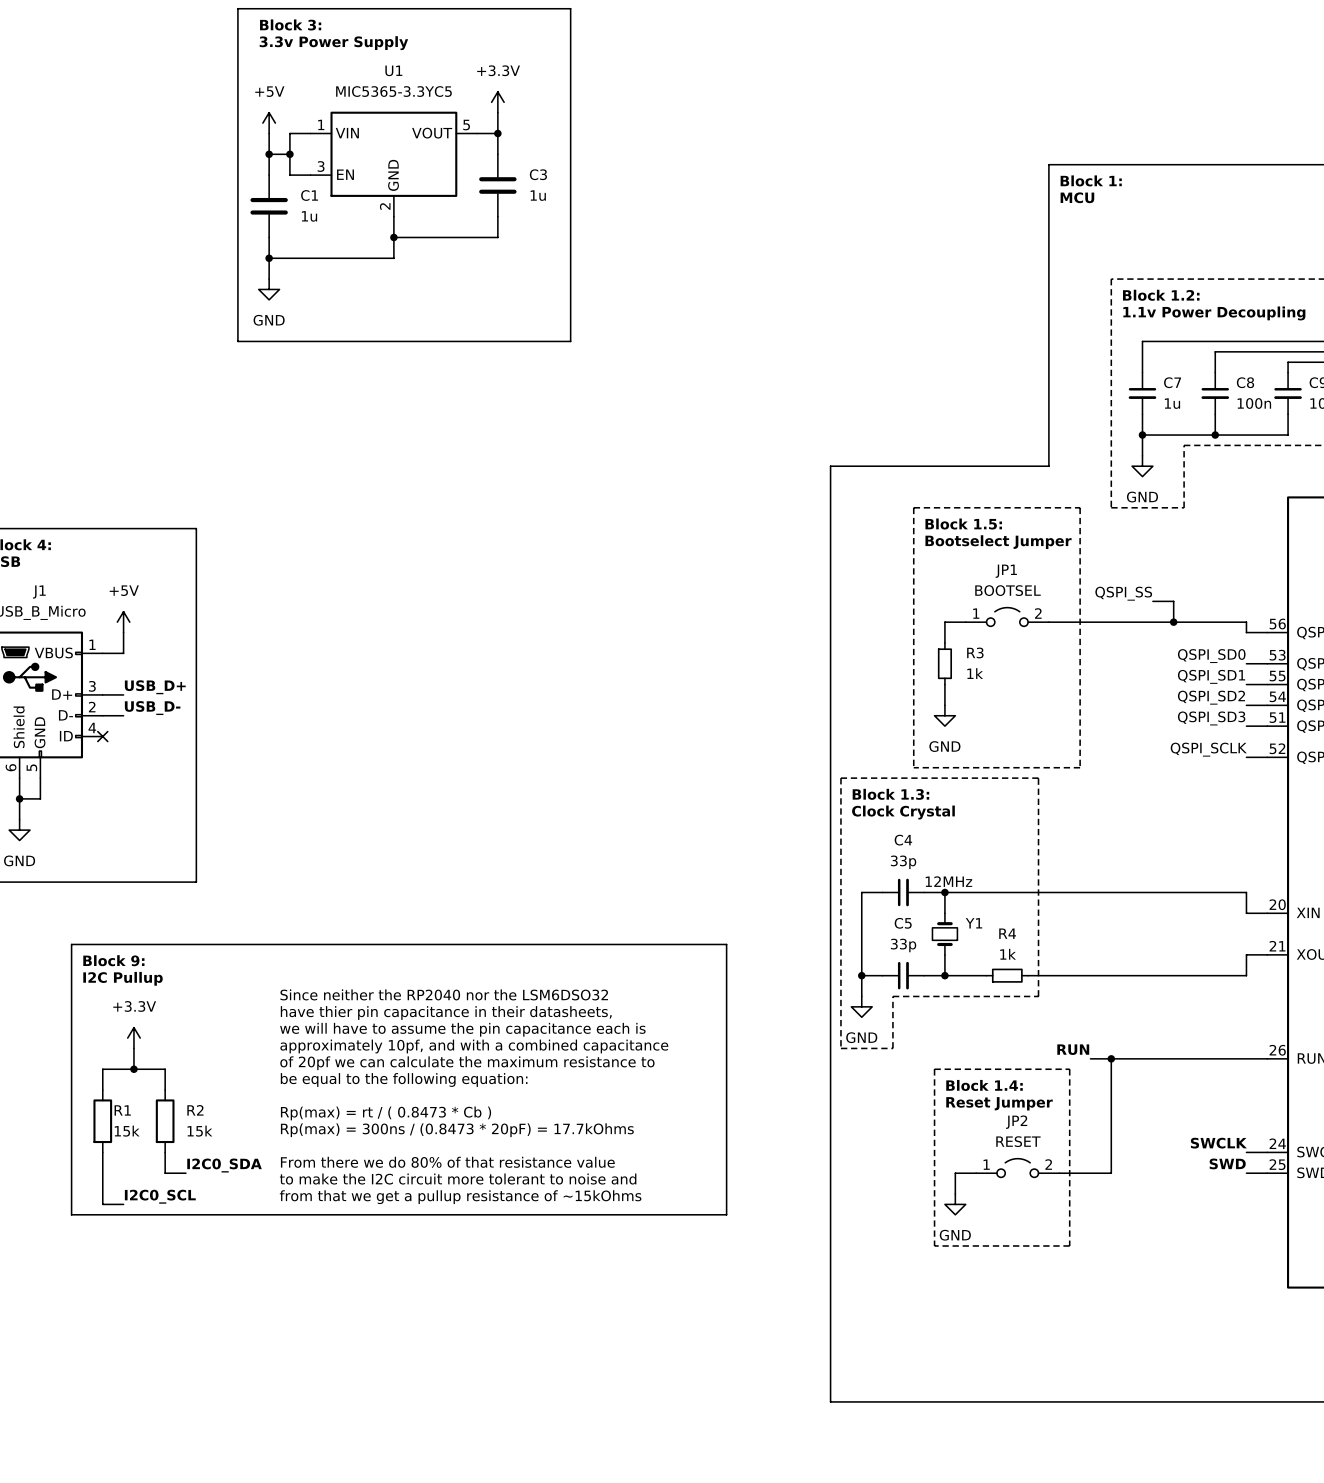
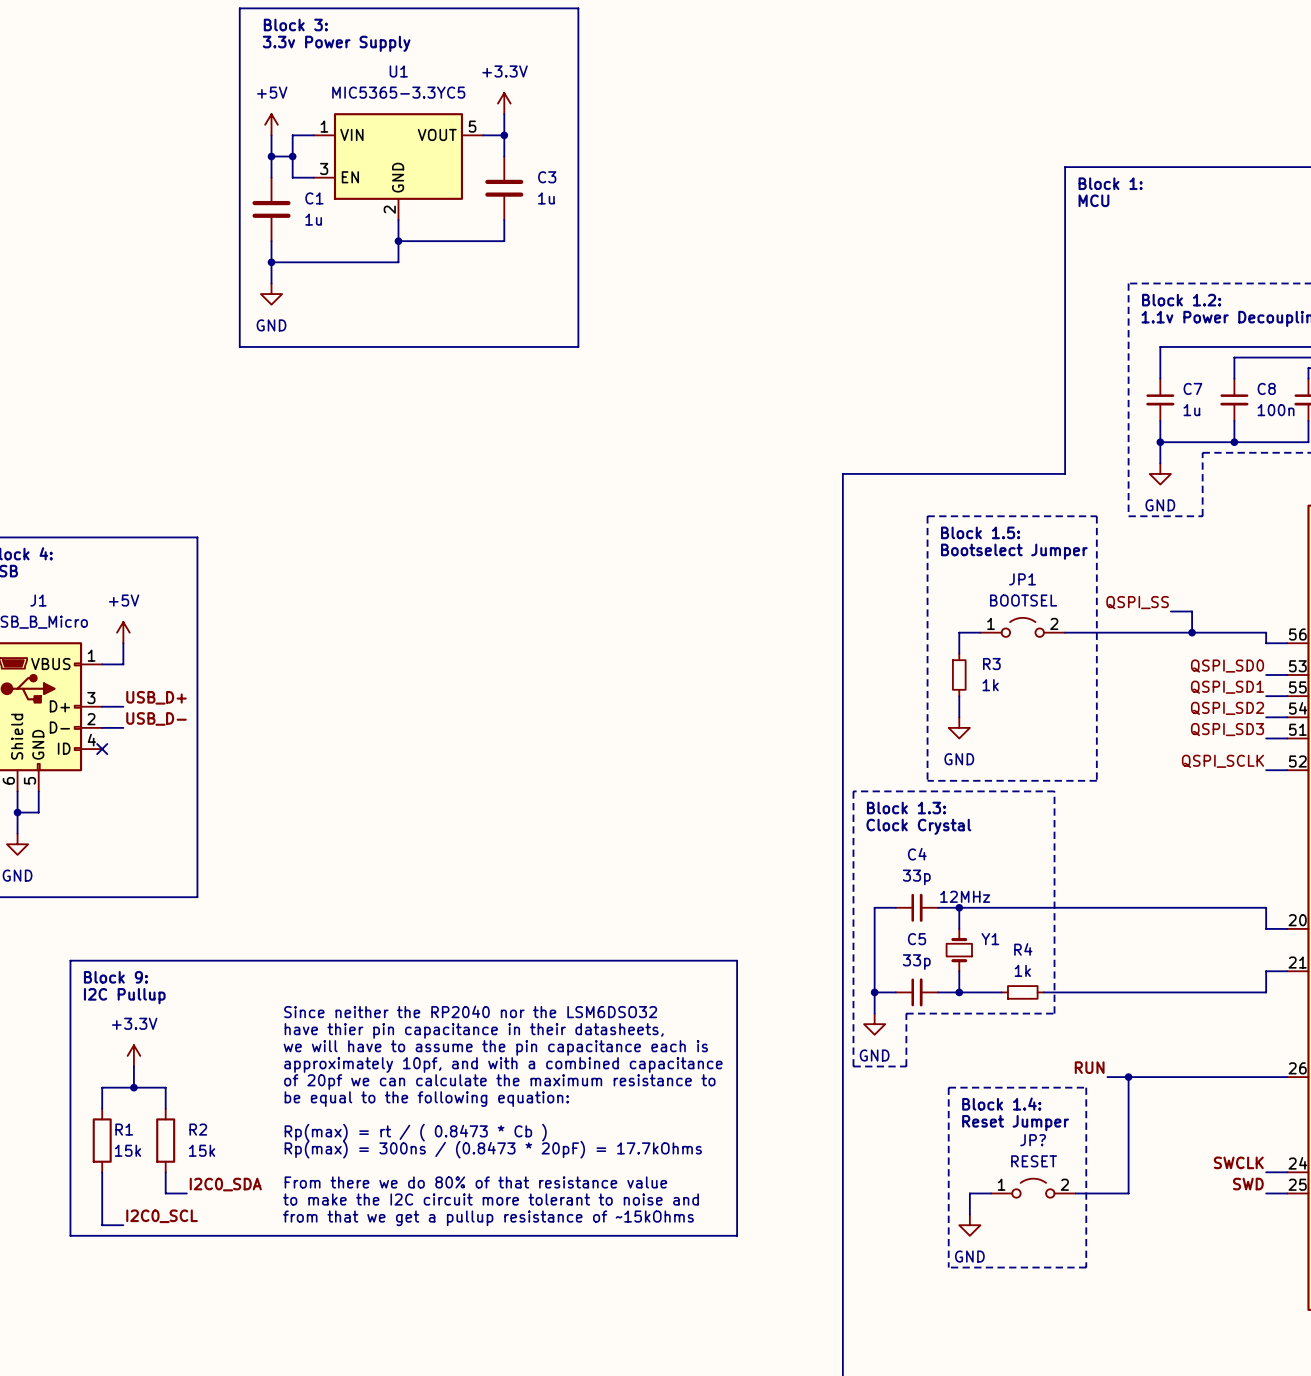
JP2 name: JP2 (1016, 1122) -> JP? (1033, 1140)

